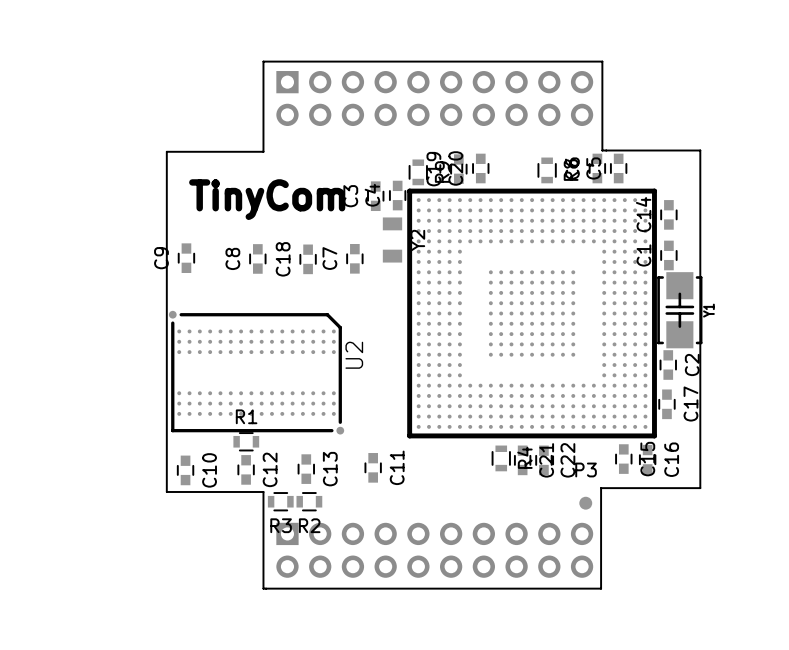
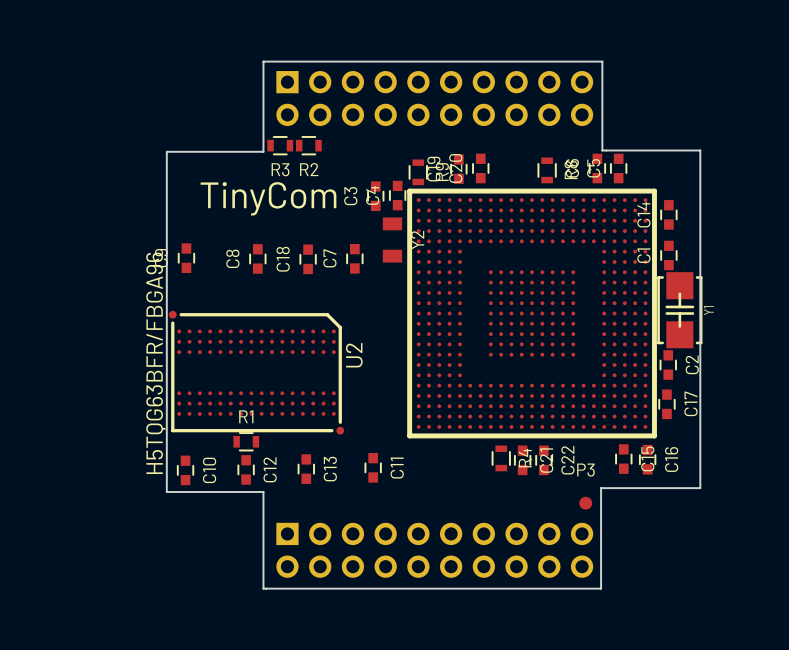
U2 value: none -> H5TQG63BFR/FBGA96 (155, 363)
R3 position: (280, 501) -> (280, 145)
R2 position: (309, 501) -> (308, 145)

